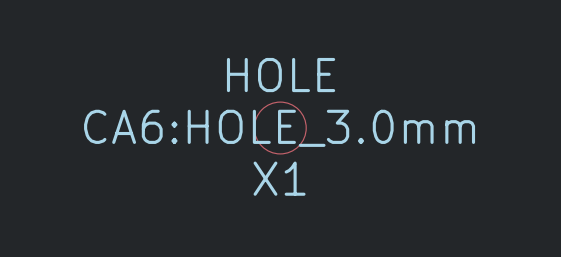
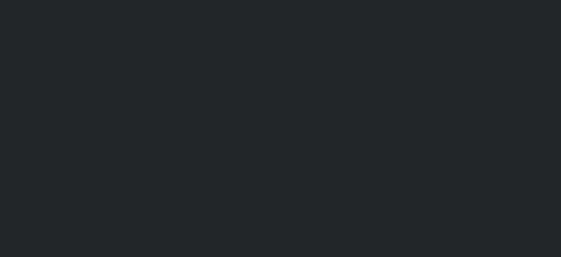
X1: HOLE (280, 128) -> none

